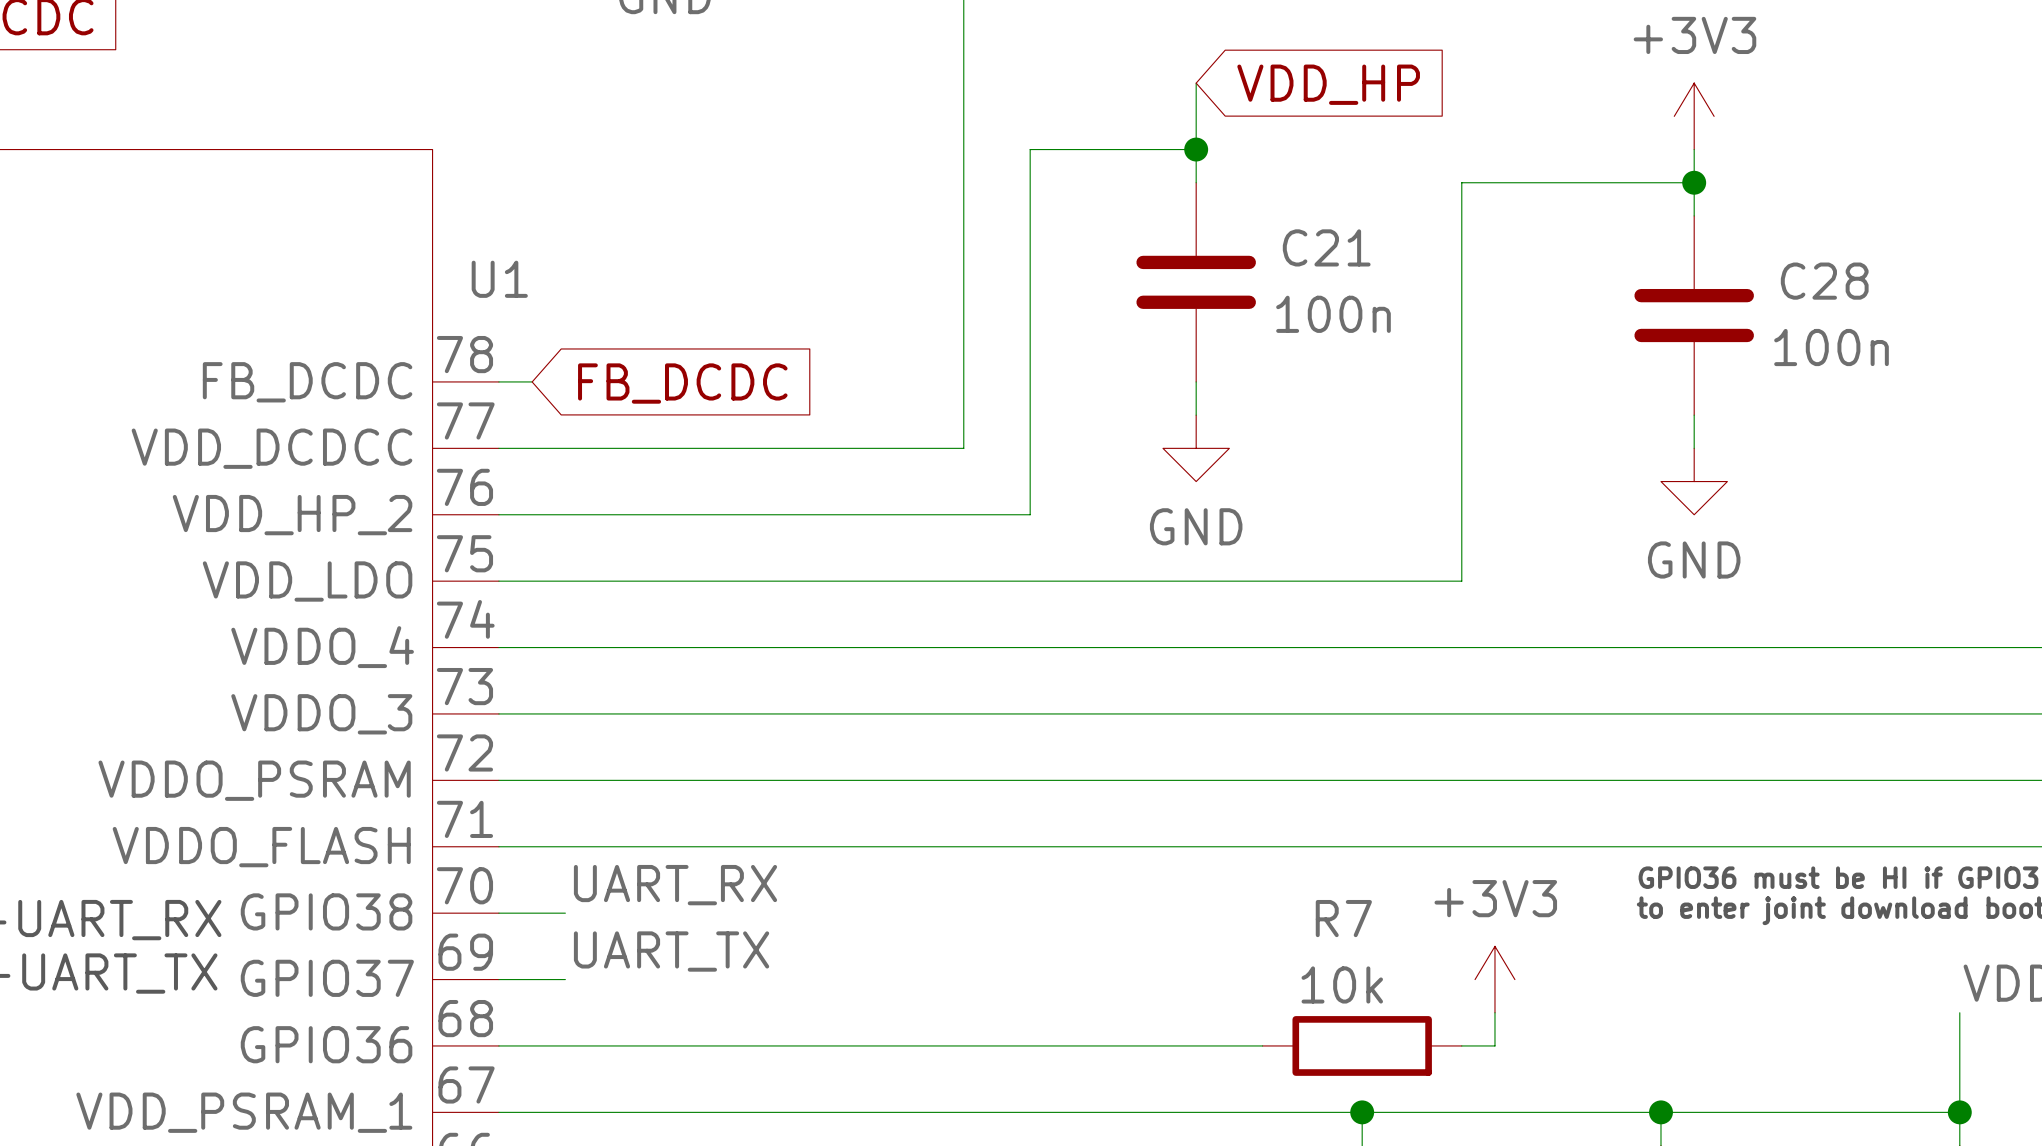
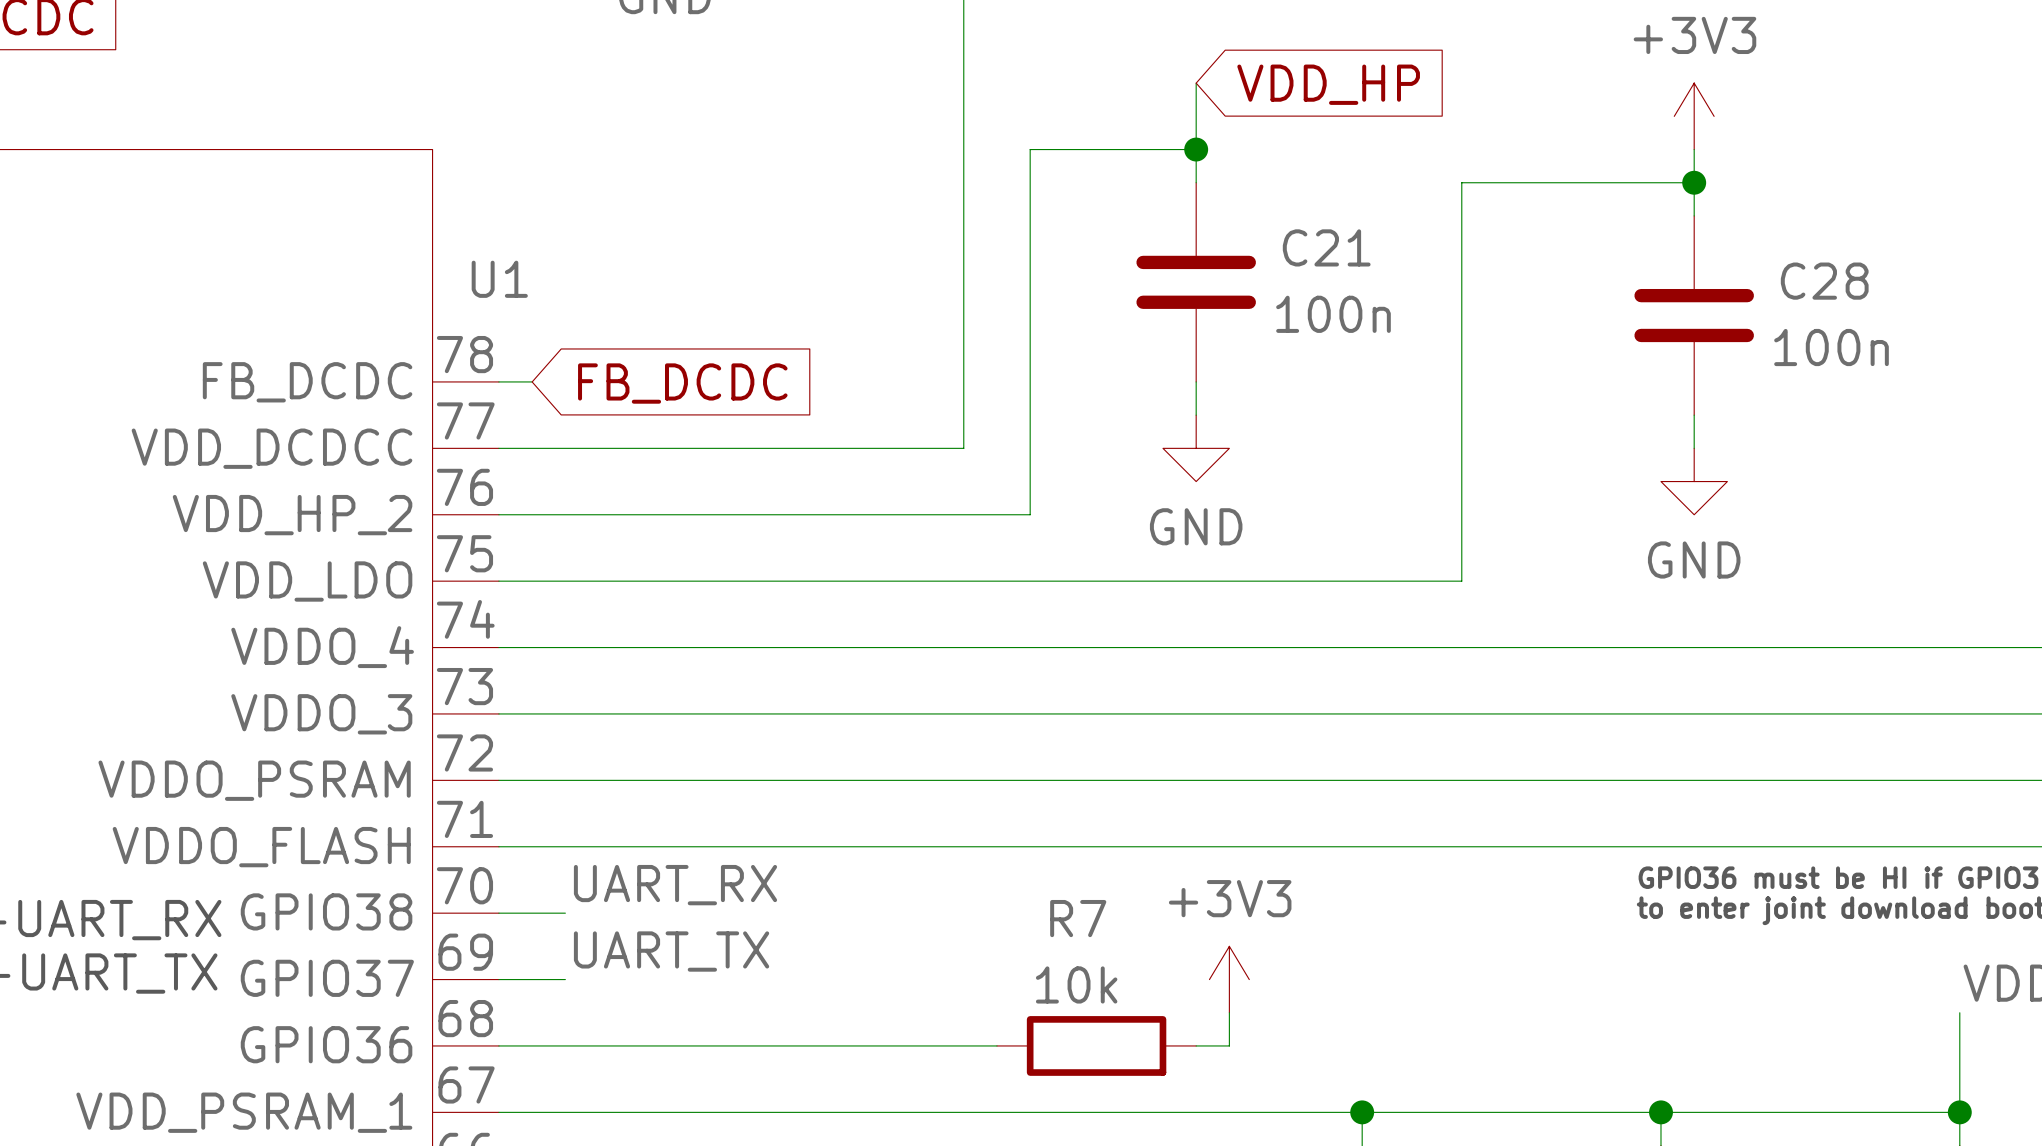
power symbol position: +3V3 (1494, 979) -> +3V3 (1229, 979)
wire: (1494, 1012) (1494, 1045) (1461, 1045) -> none
wire: (996, 1045) (1196, 1045) -> none
wire: (1229, 1045) (1262, 1045) -> (1229, 1045) (1229, 1012)
R7 position: (1362, 1045) -> (1096, 1045)

